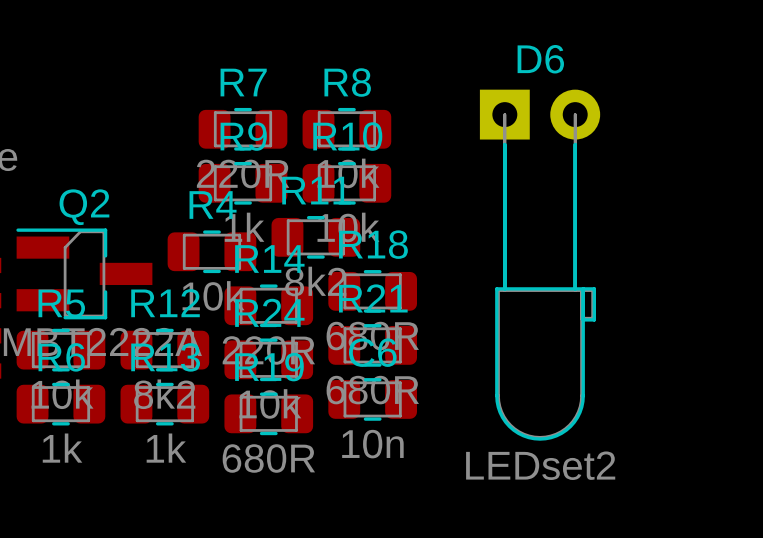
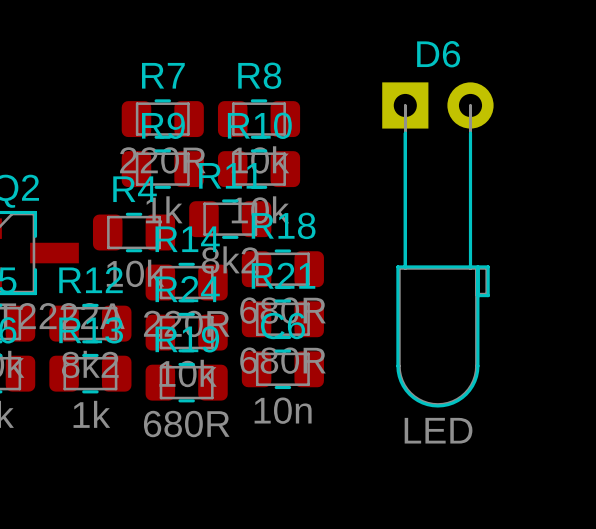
D6 value: LEDset2 (540, 465) -> LED (438, 430)

